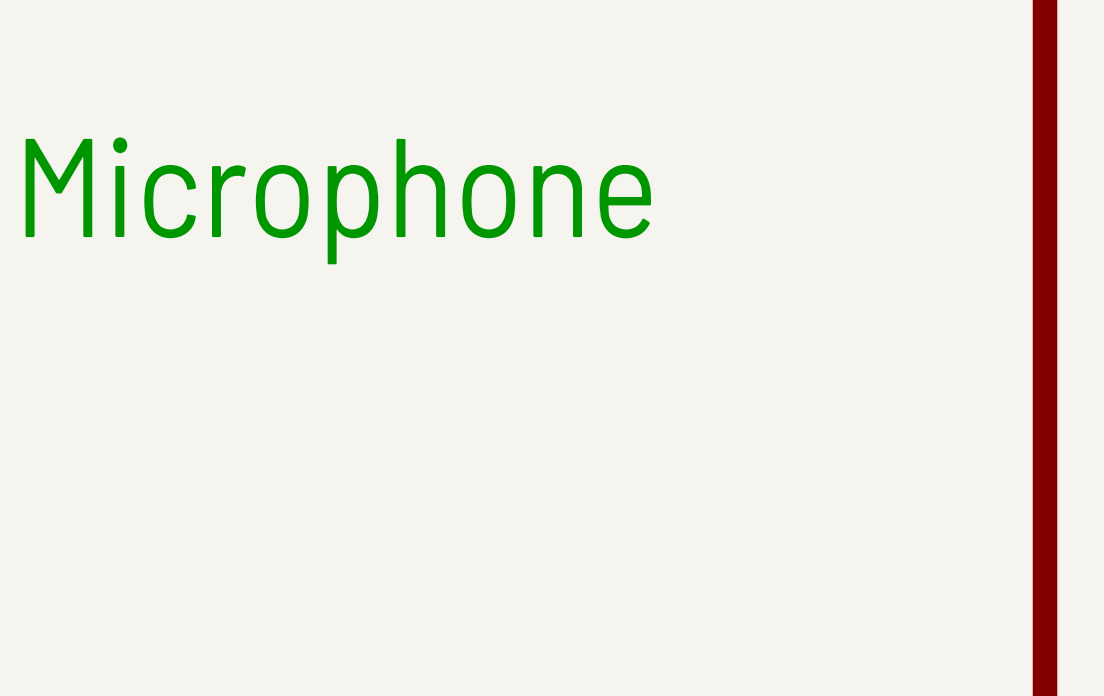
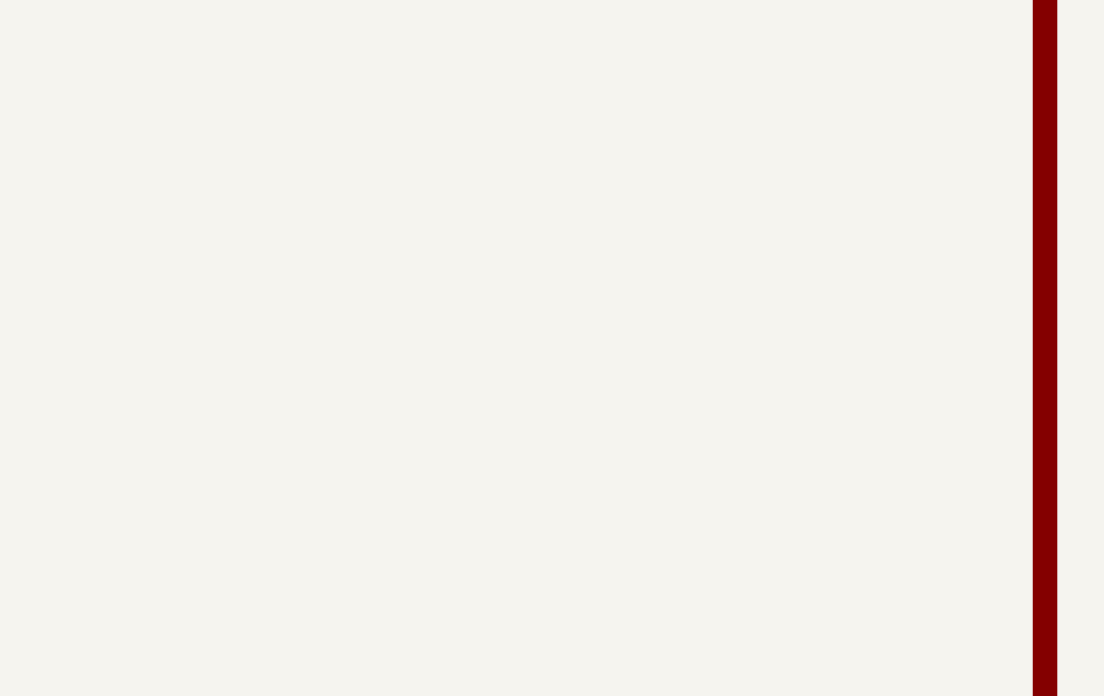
text: Microphone (338, 200) -> none

